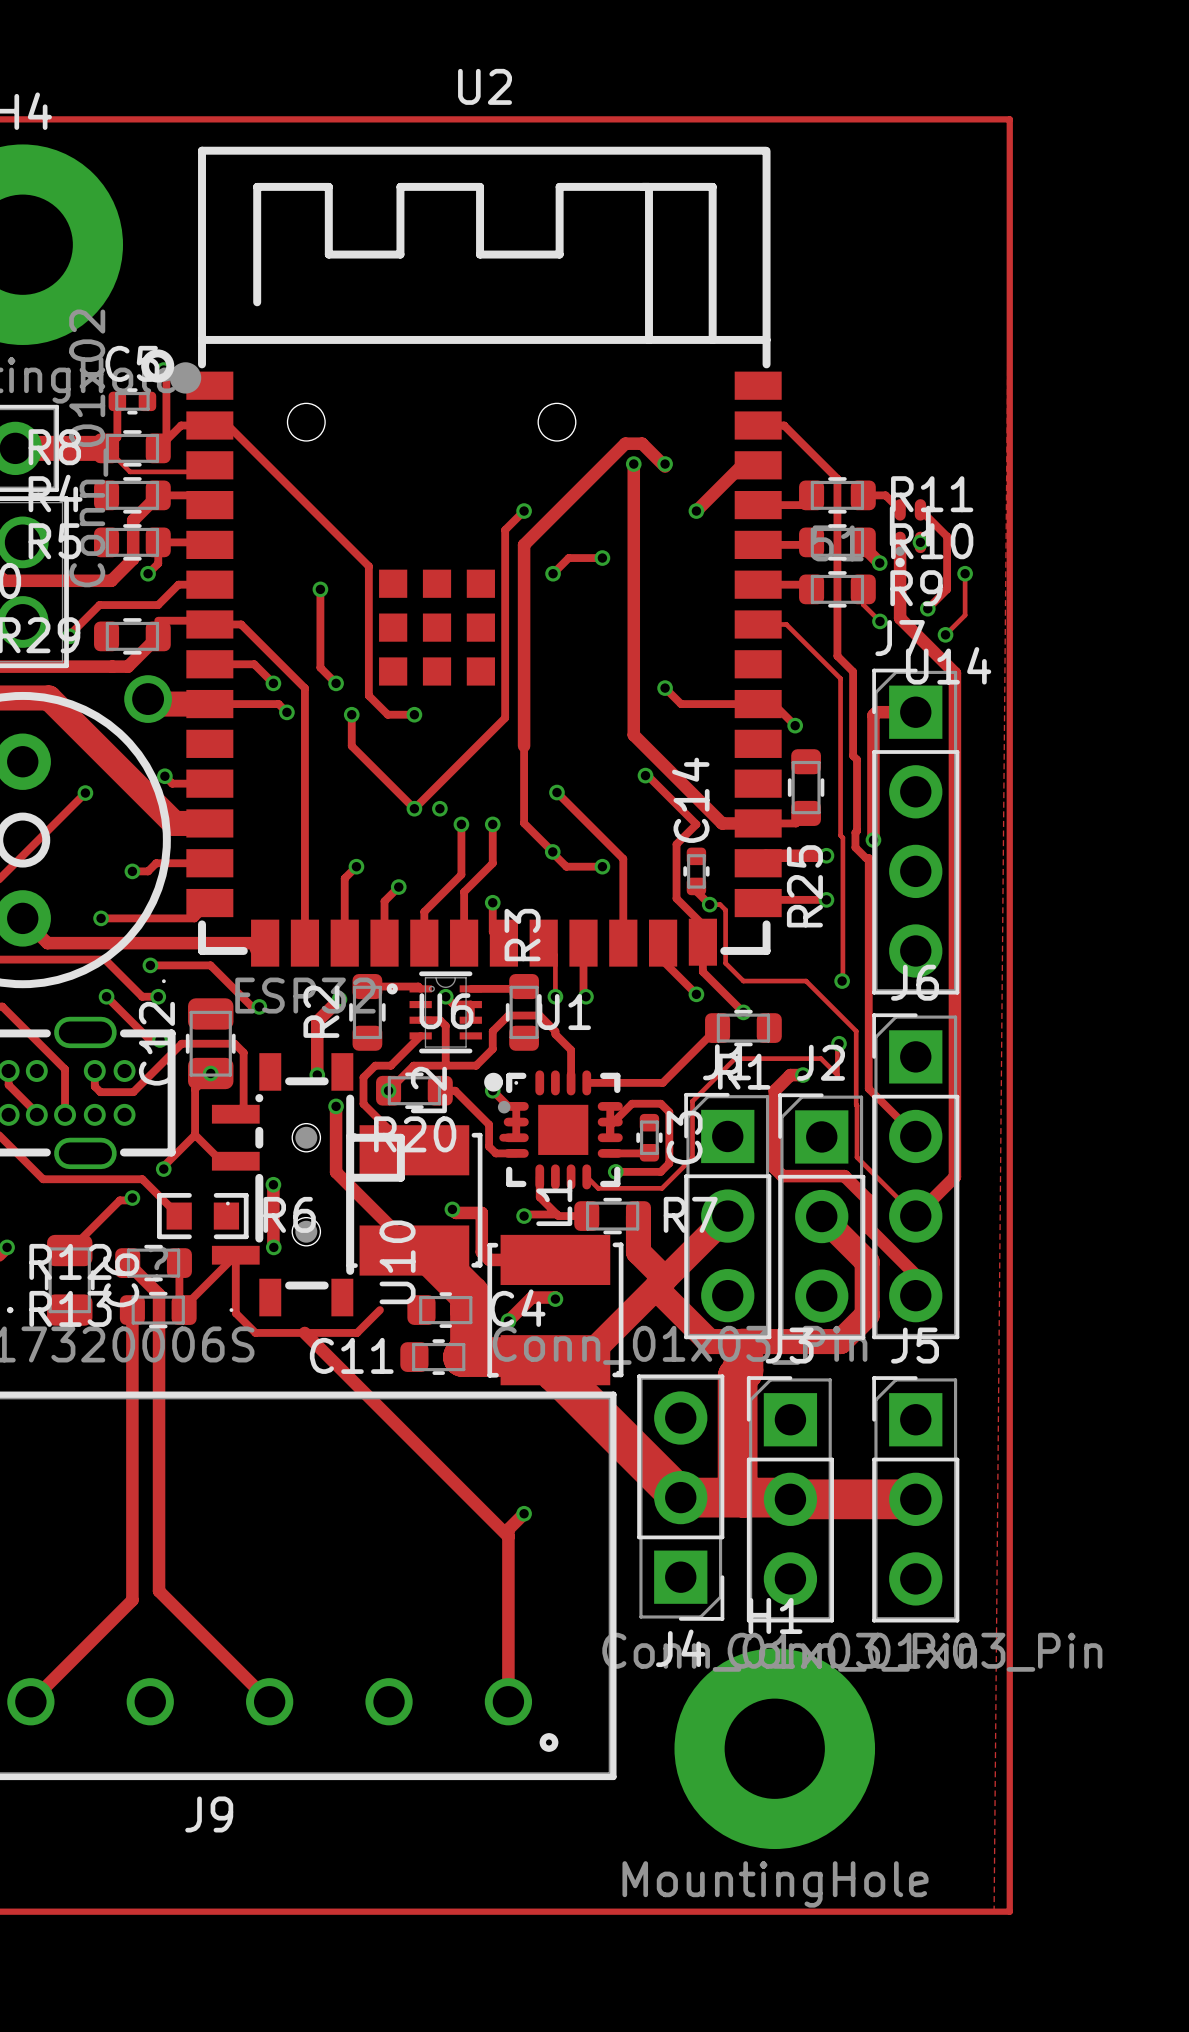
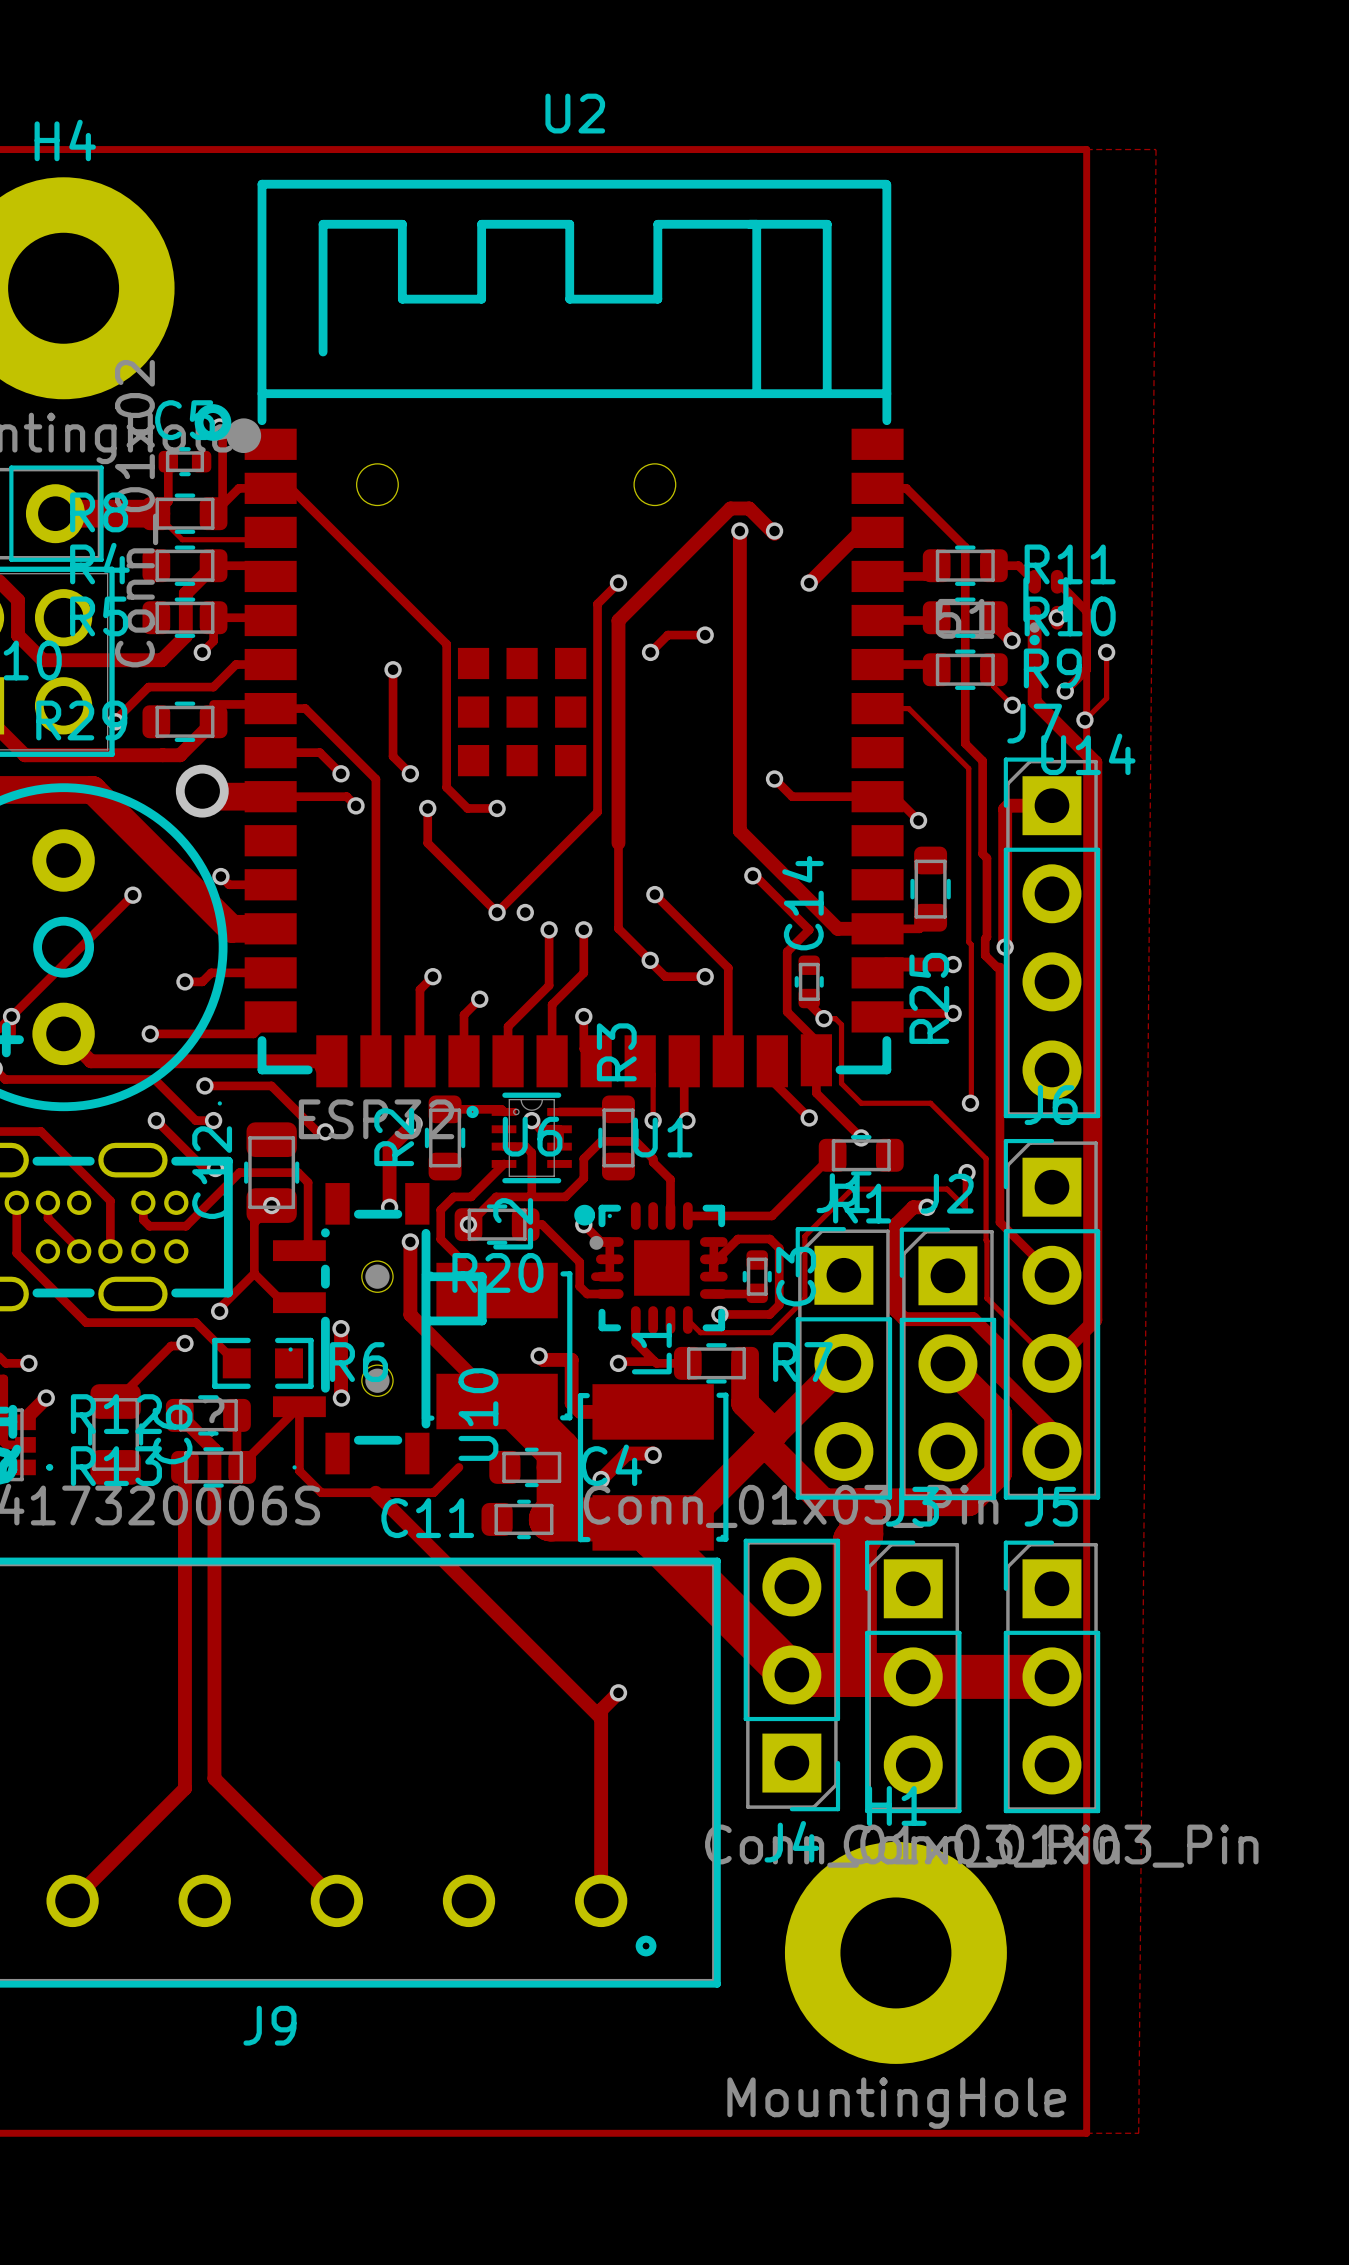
track: (947, 119) (1009, 119) (1009, 1911) (947, 1911) -> (1086, 149) (1086, 2133)

